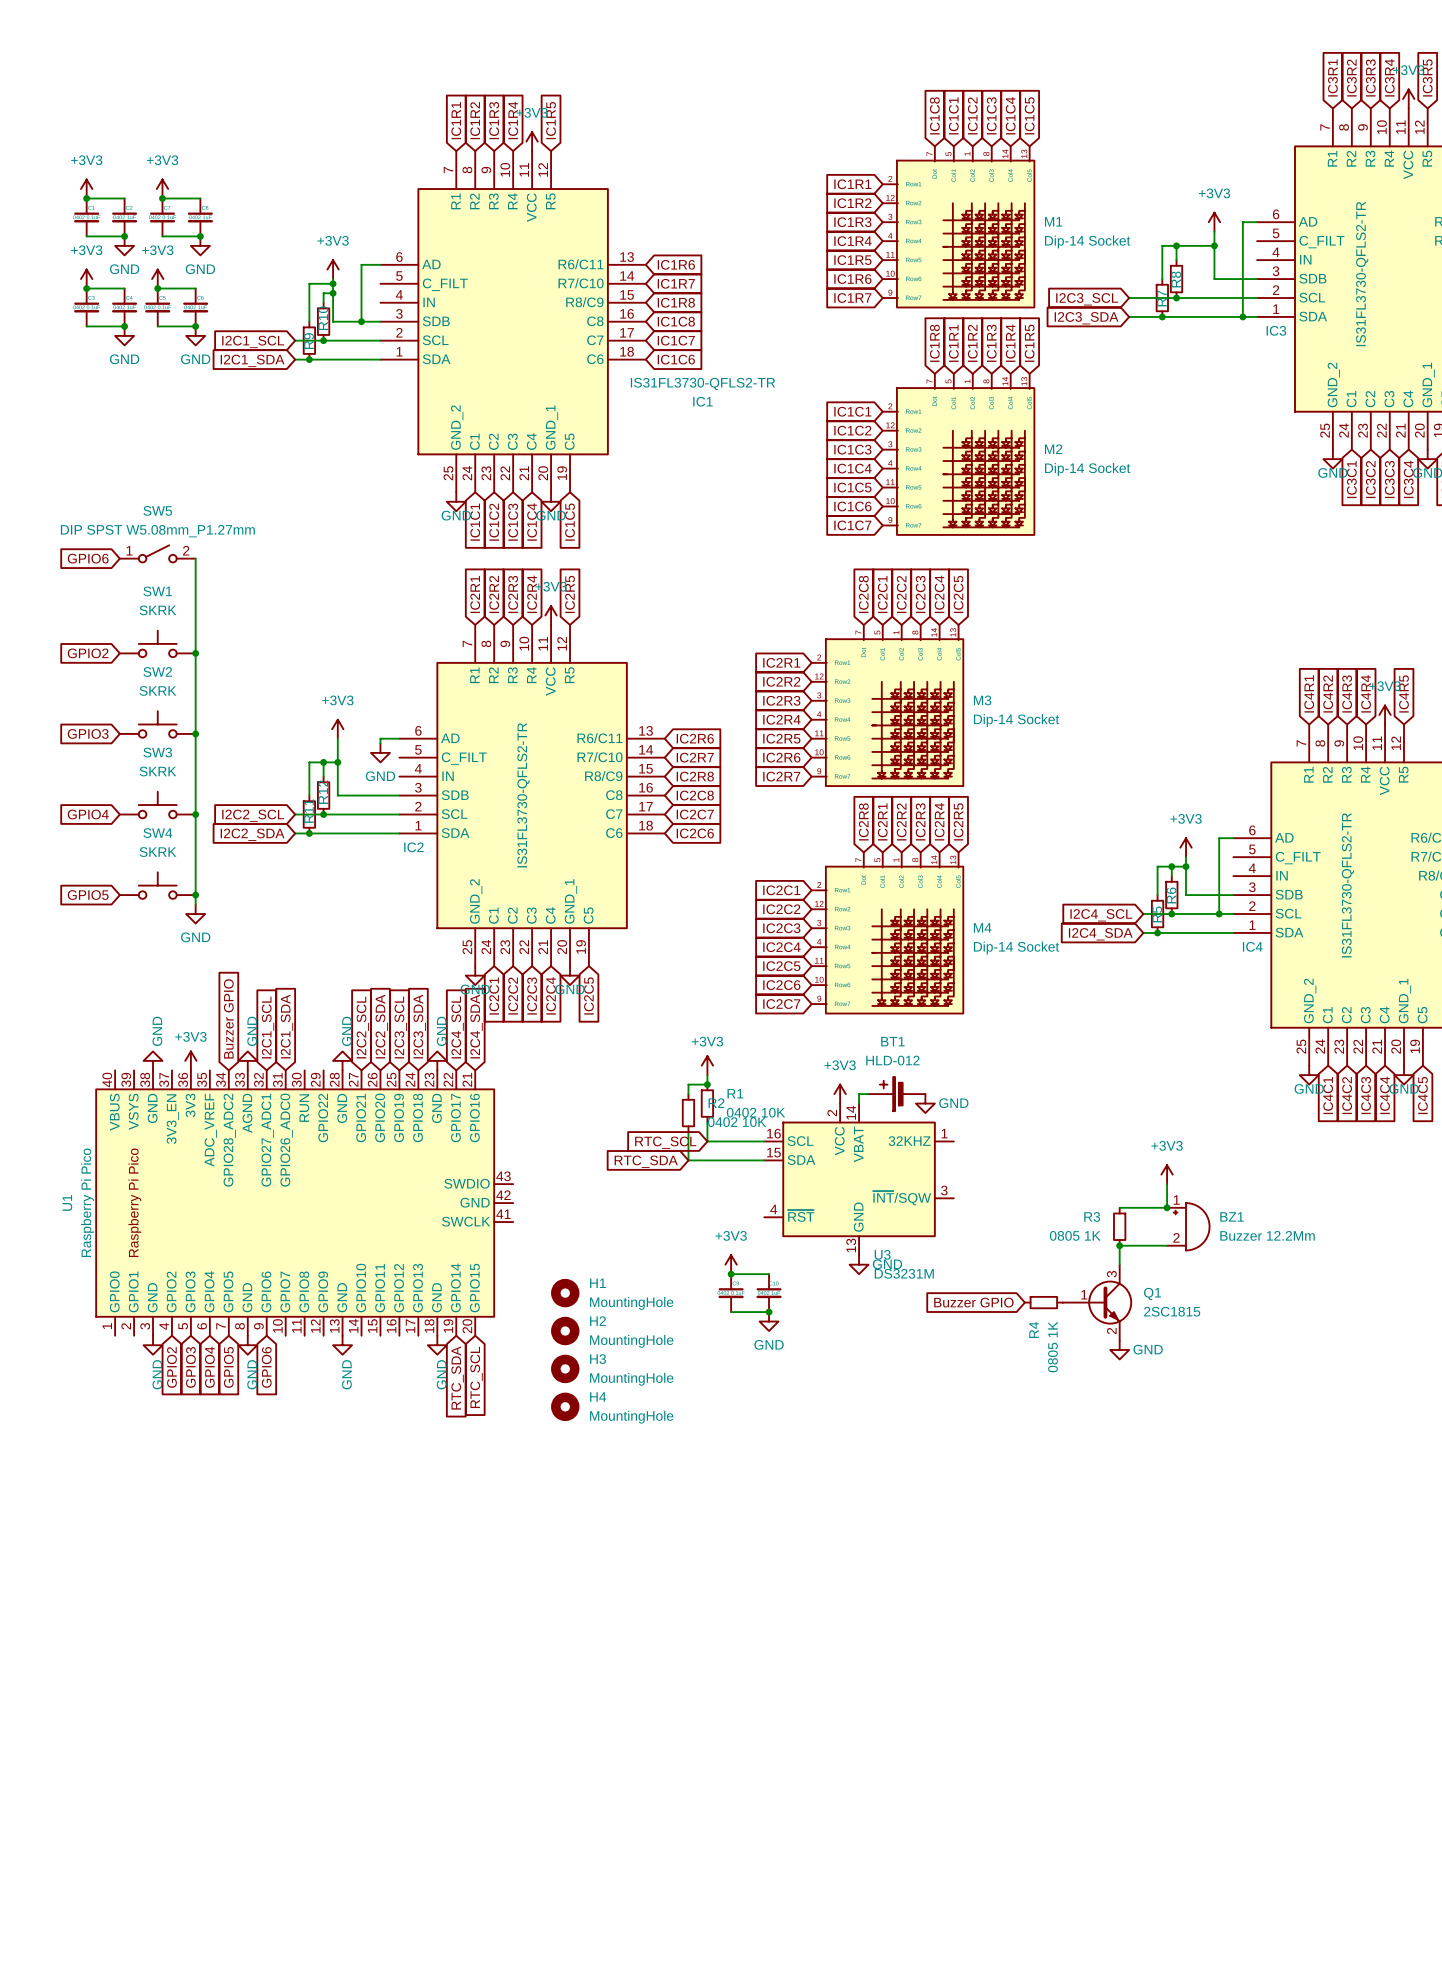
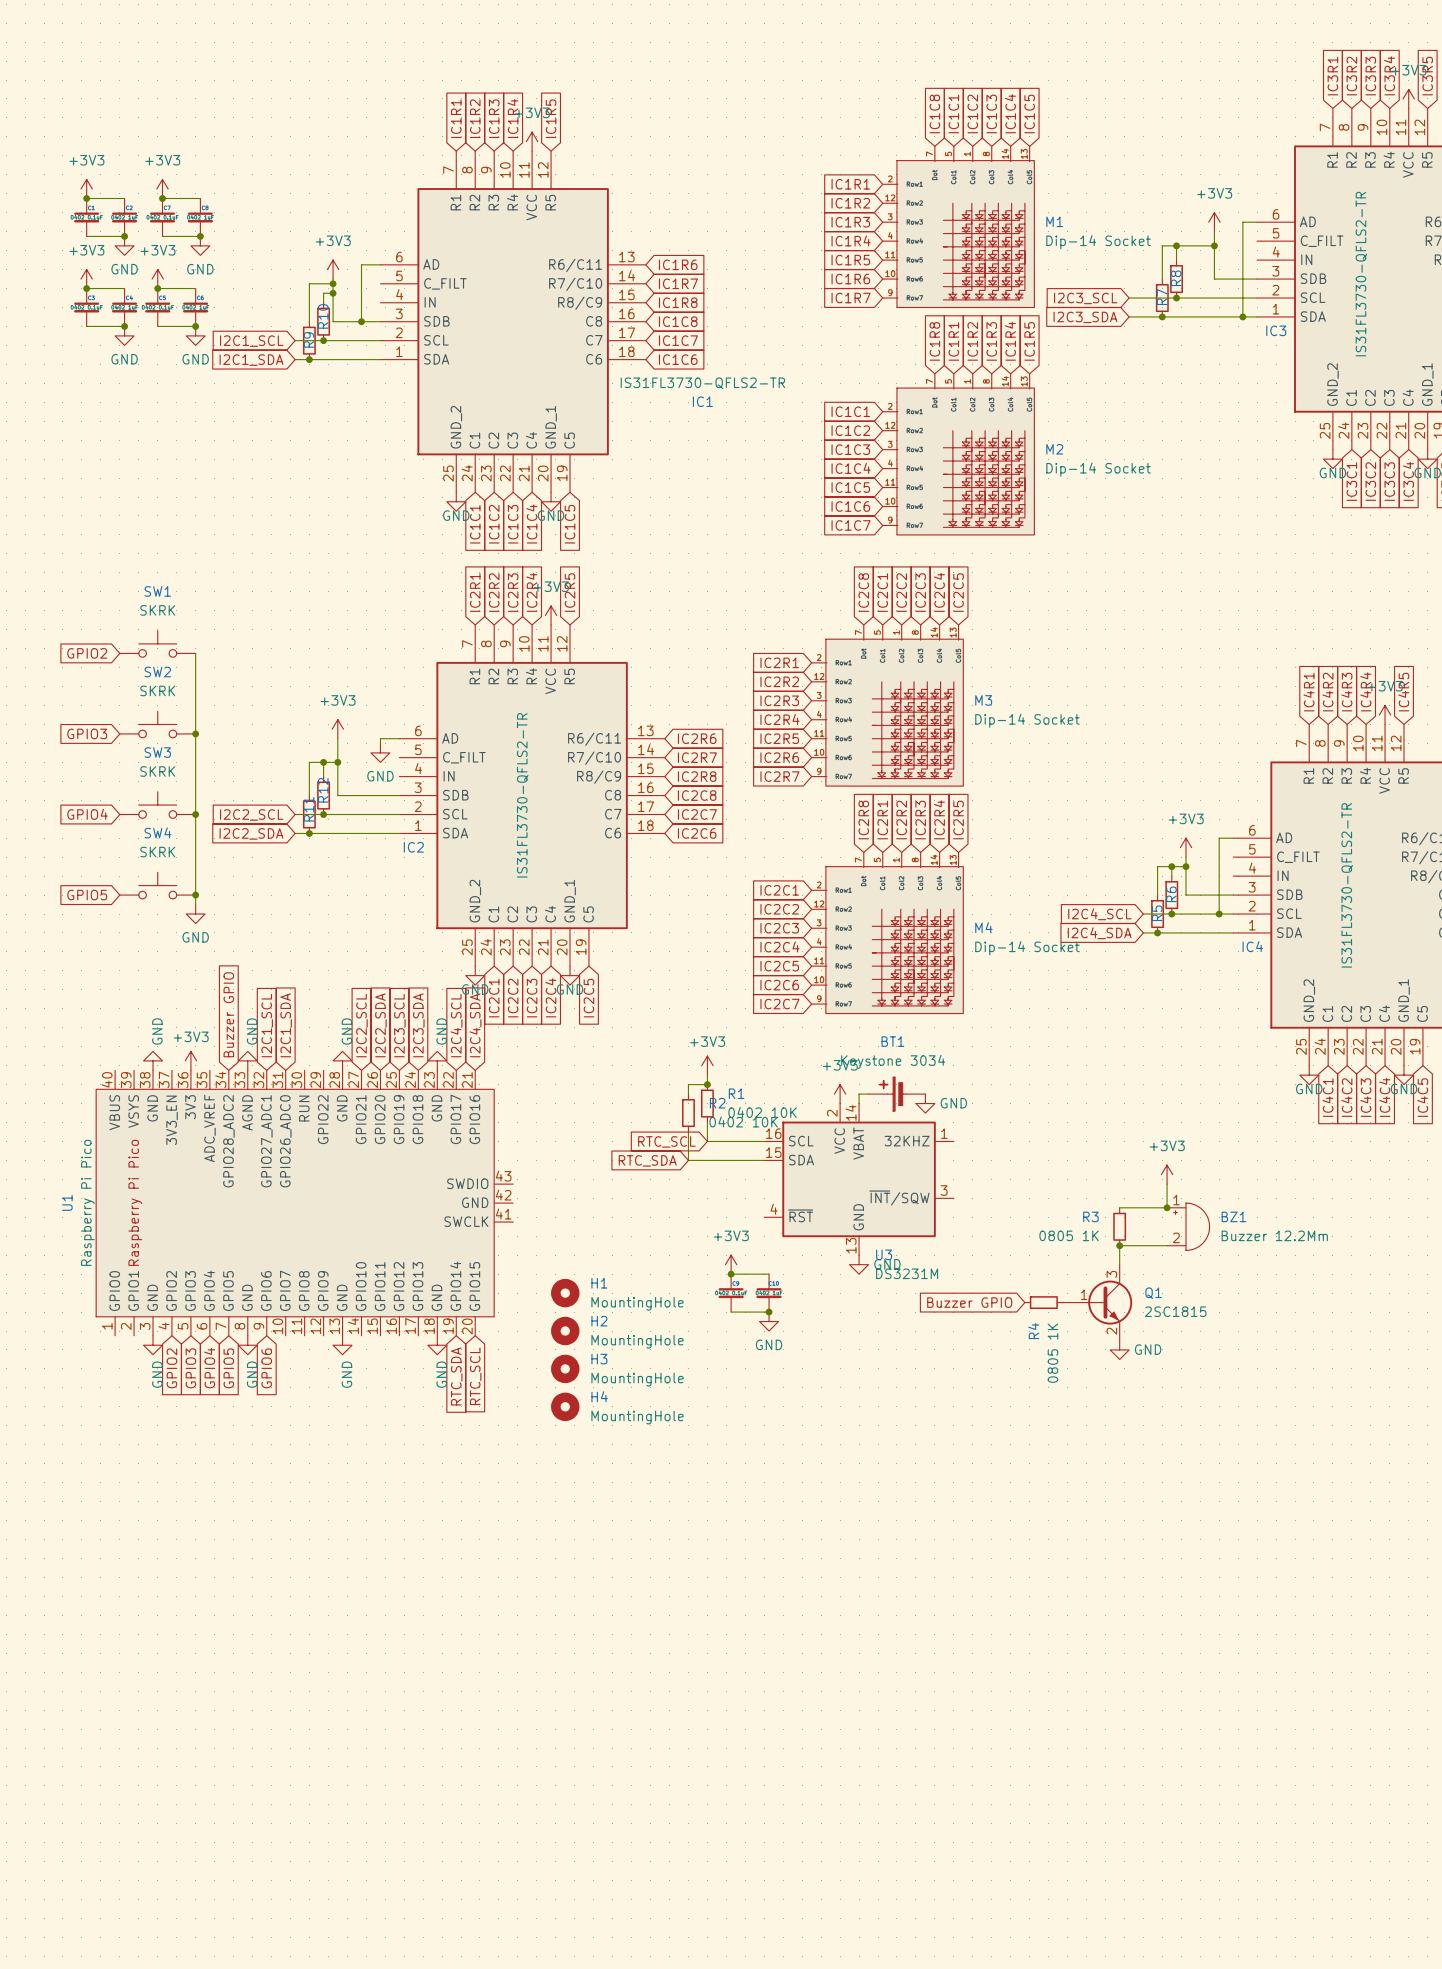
SW5: DIP SPST W5.08mm_P1.27mm (157, 553) -> none
global label: GPIO6 (88, 558) -> none
wire: (195, 558) (195, 653) -> none
junction: (195, 653) -> none
BT1 value: HLD-012 (892, 1060) -> Keystone 3034 (893, 1061)

